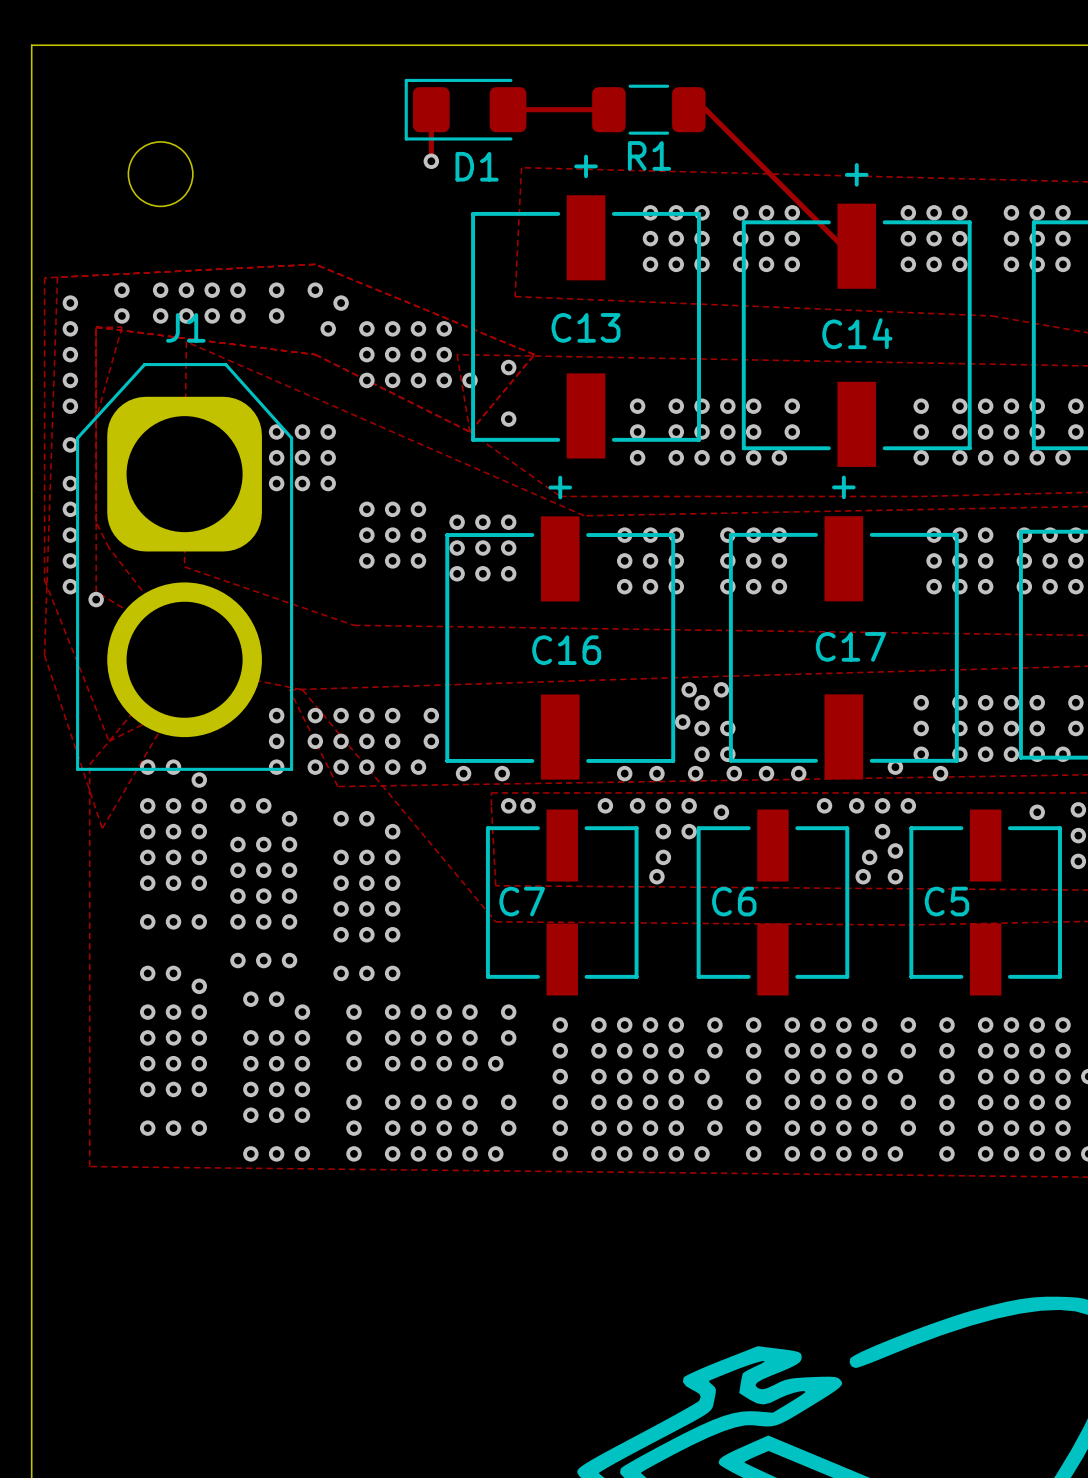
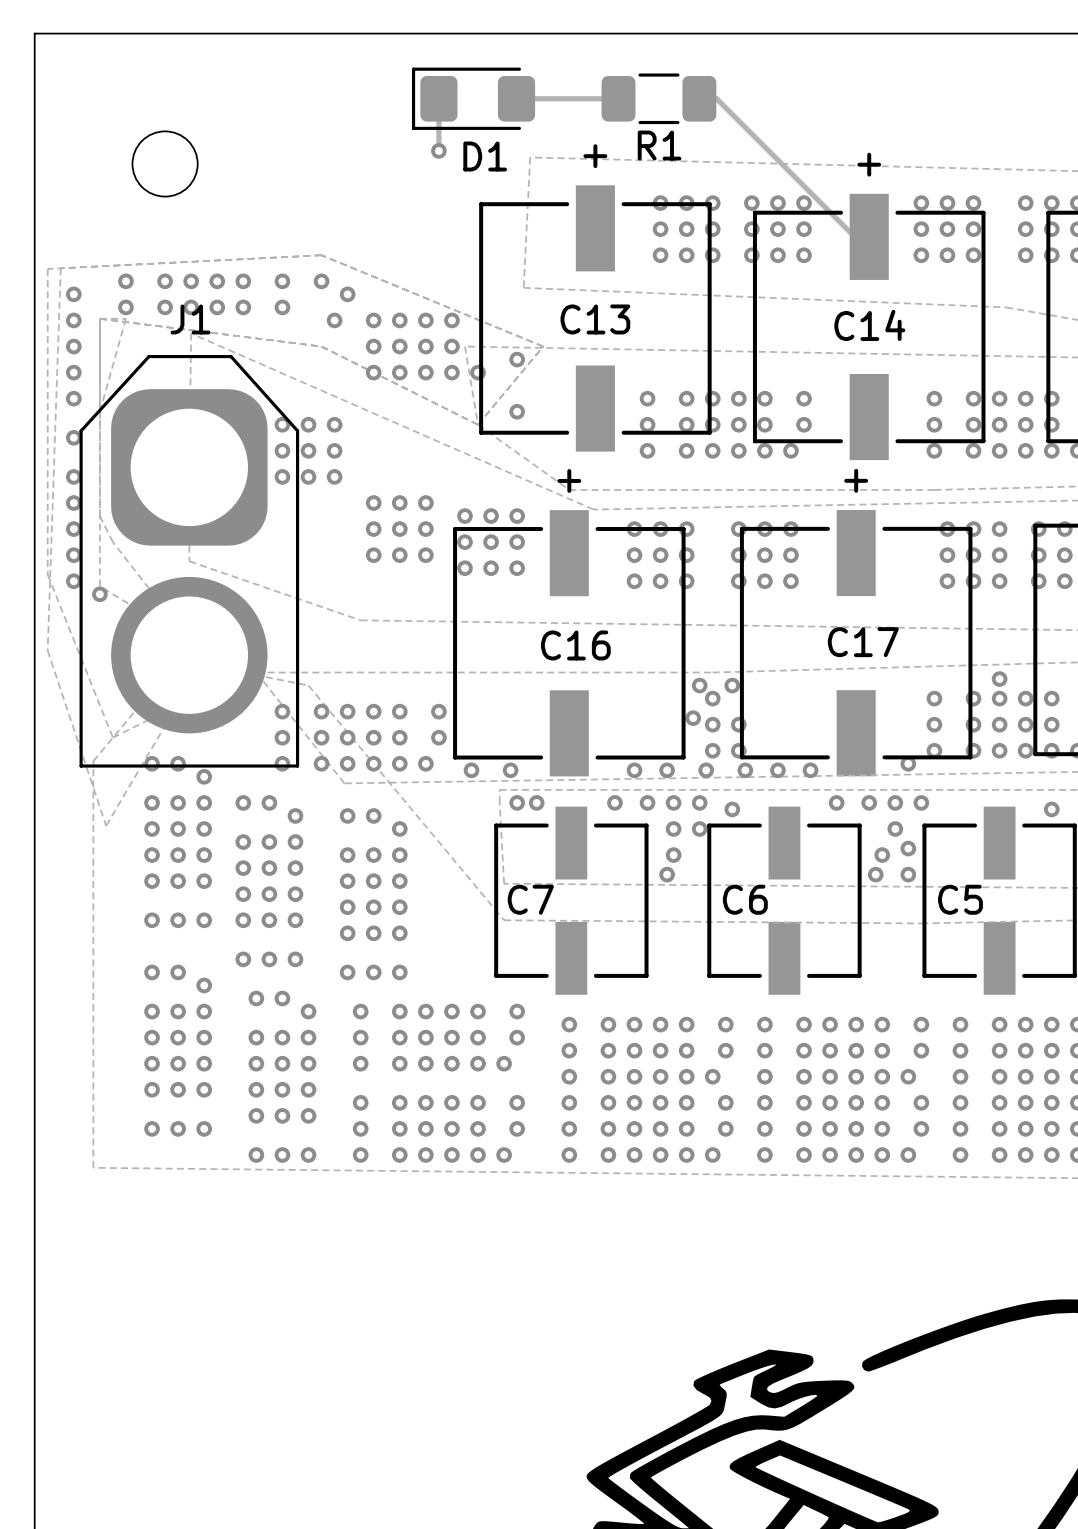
zone outline: (702, 676) (289, 689) (337, 786) -> (712, 672) (256, 672) (344, 783)
via position: (940, 773) -> (999, 679)

